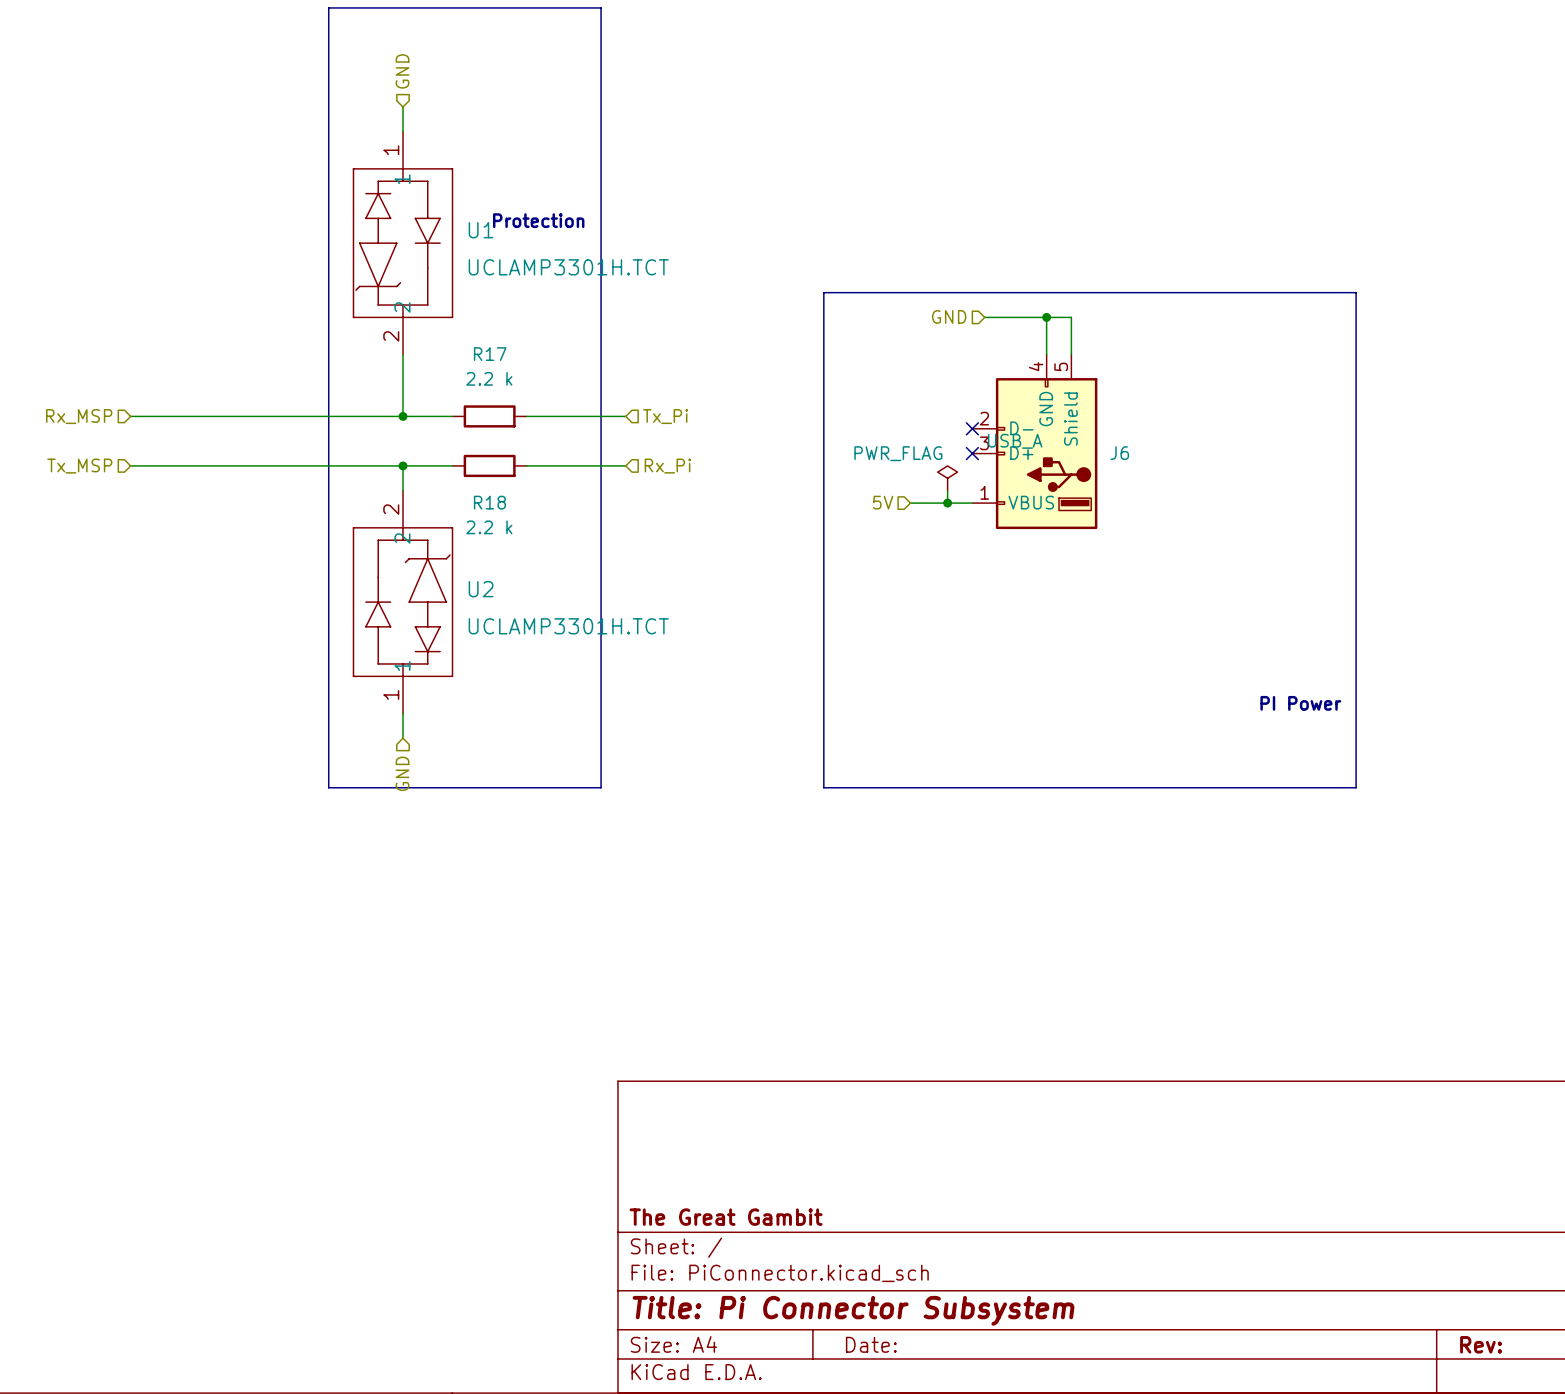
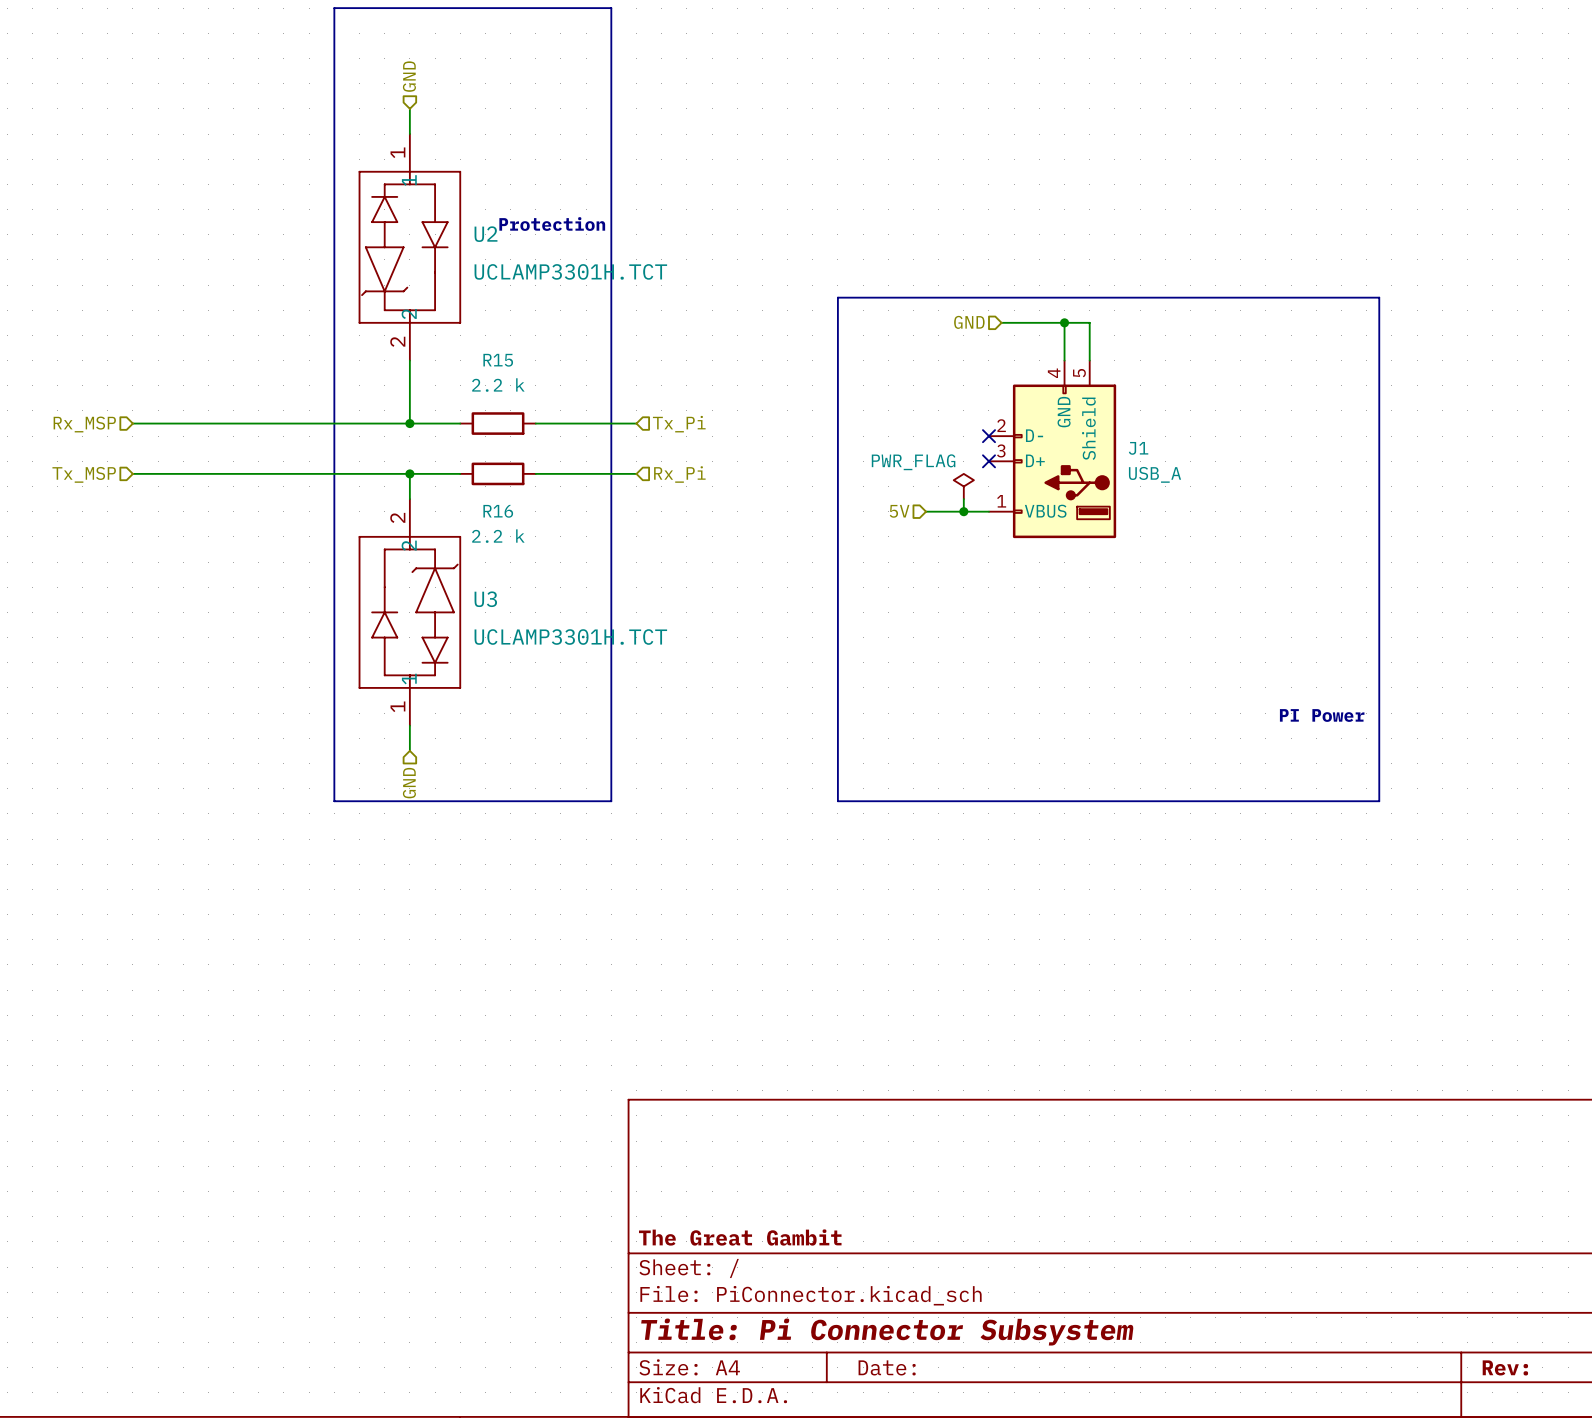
U1 name: U1 (481, 230) -> U2 (486, 234)
R17 name: R17 (490, 354) -> R15 (498, 360)
J6 value position: USB_A (1015, 441) -> USB_A (1154, 474)
J6 name: J6 (1119, 453) -> J1 (1138, 448)
R18 name: R18 (489, 502) -> R16 (498, 511)
U2 name: U2 (481, 589) -> U3 (485, 599)

